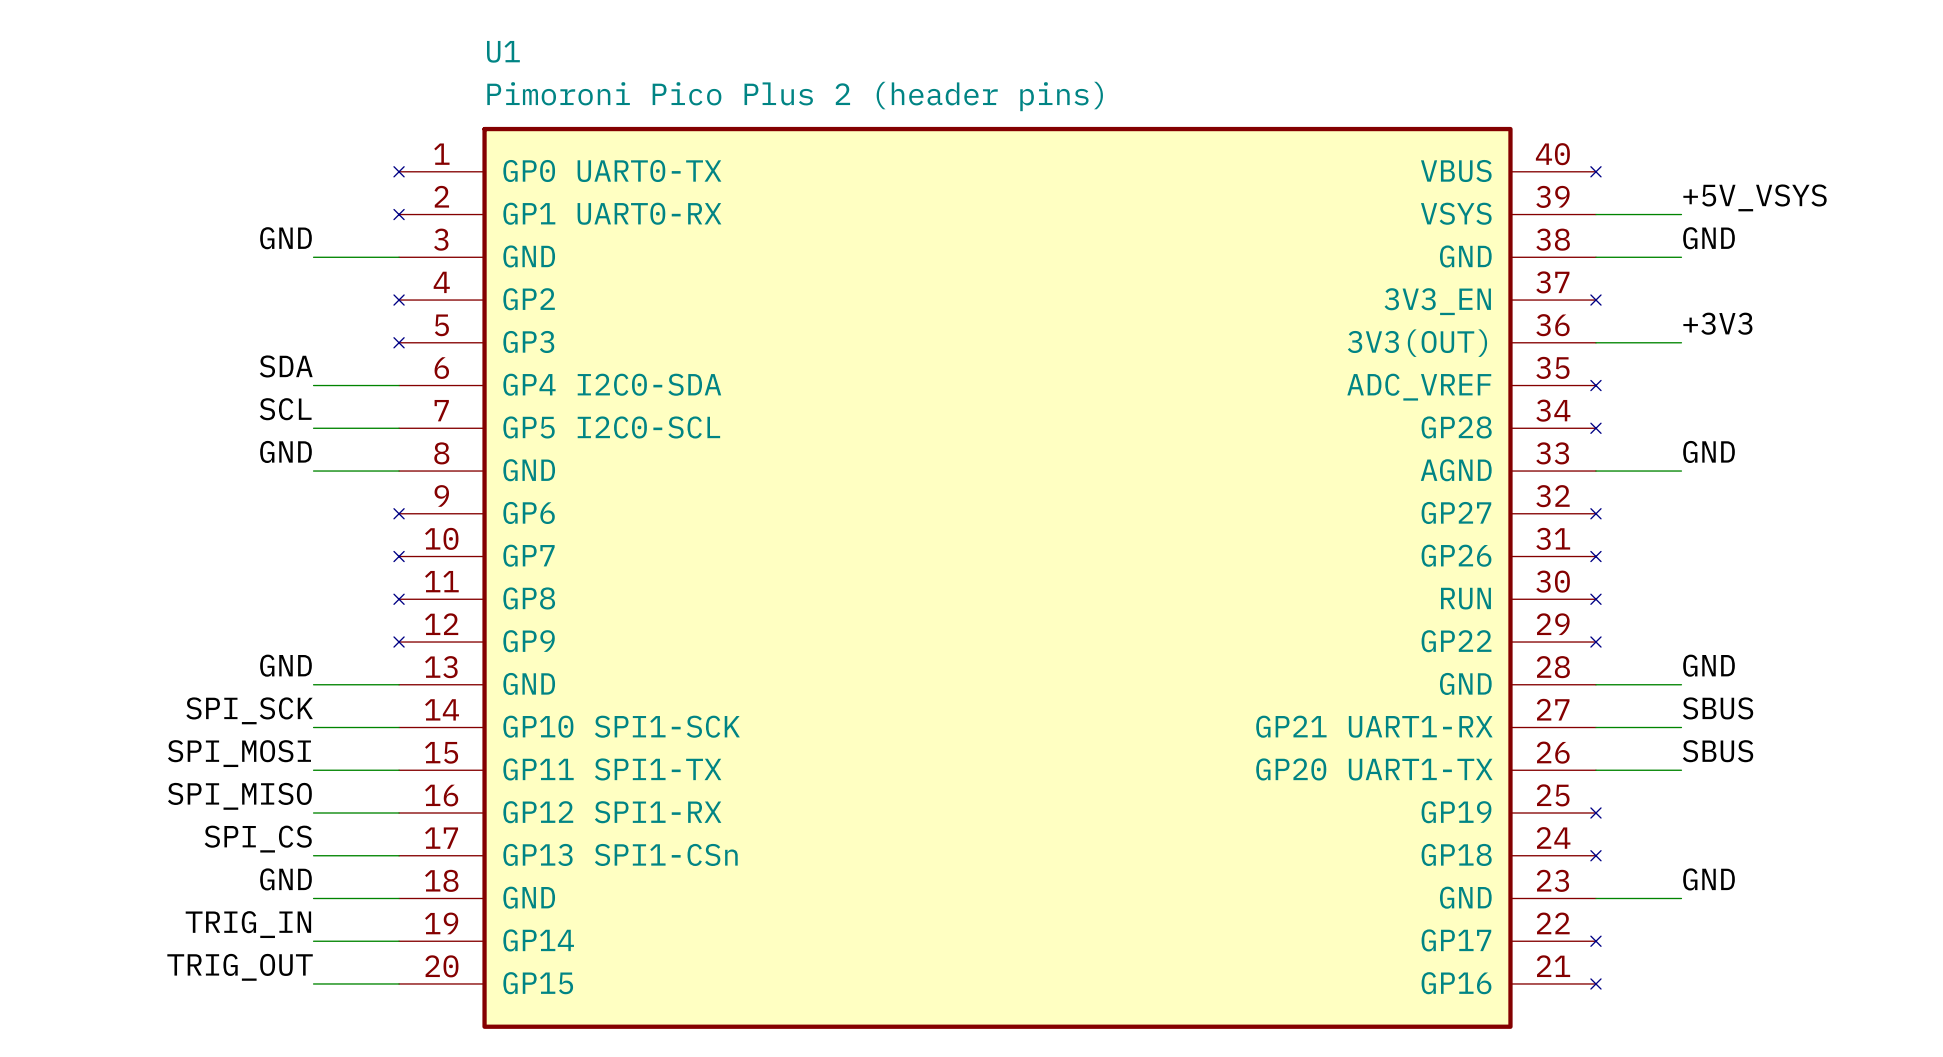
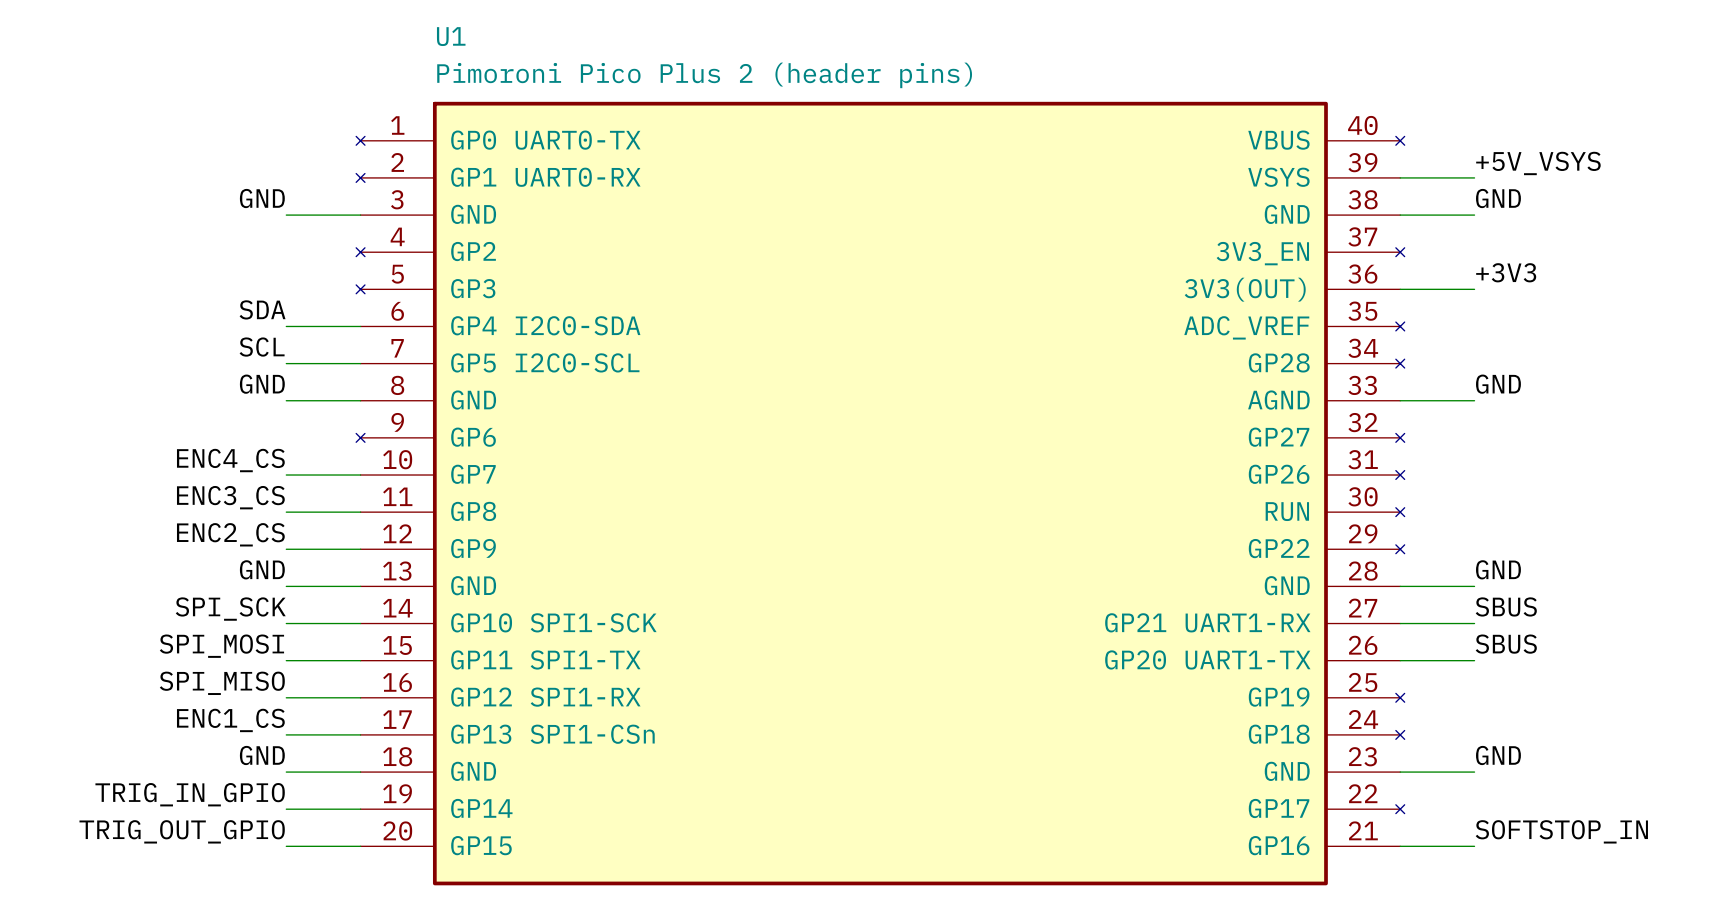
U1 symbol: [394, 126, 1602, 1029] -> [356, 101, 1405, 886]
label: none -> ENC4_CS (230, 460)
wire: none -> (286, 475) (360, 475)
label: none -> ENC3_CS (230, 497)
wire: none -> (286, 512) (360, 512)
label: none -> ENC2_CS (230, 534)
wire: none -> (286, 549) (360, 549)
label: SPI_CS (258, 839) -> ENC1_CS (230, 720)
label: TRIG_IN (248, 924) -> TRIG_IN_GPIO (190, 794)
label: TRIG_OUT (240, 967) -> TRIG_OUT_GPIO (182, 831)
label: none -> SOFTSTOP_IN (1561, 831)
wire: none -> (1400, 846) (1474, 846)

